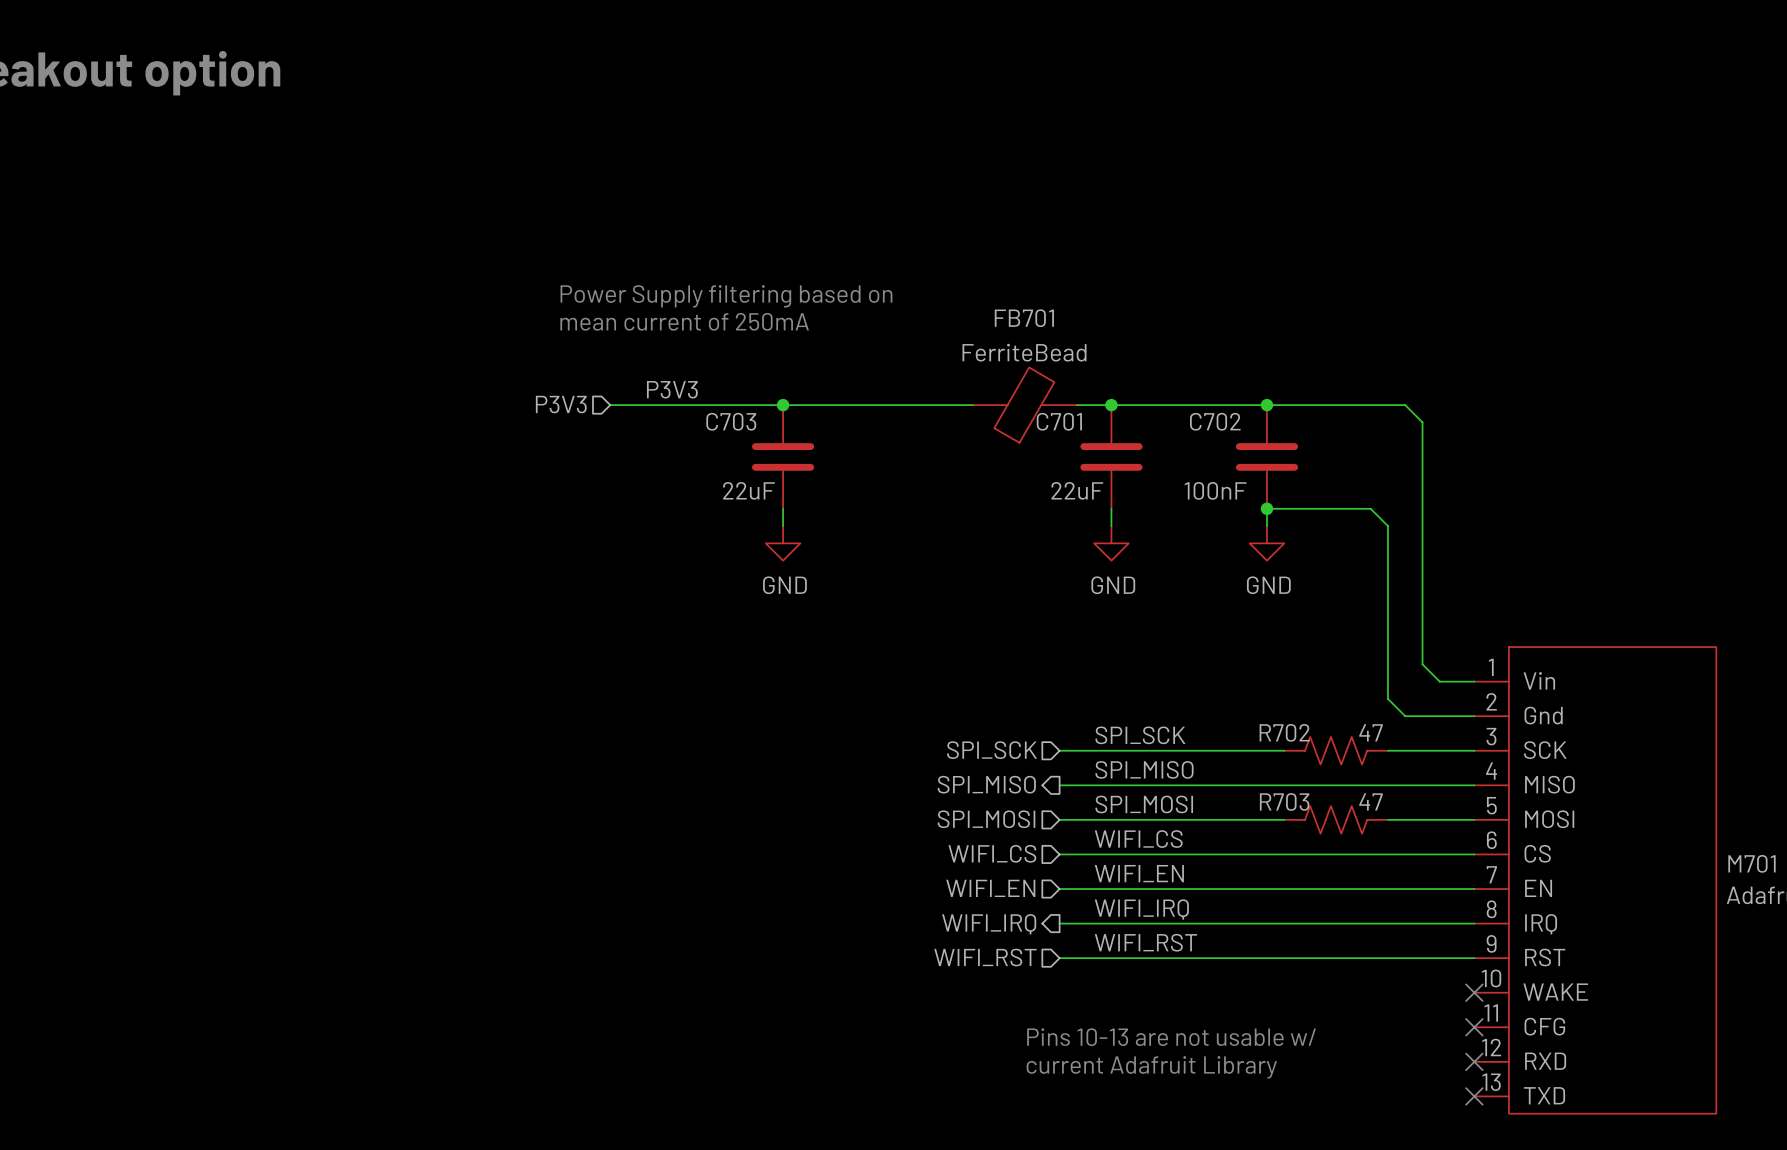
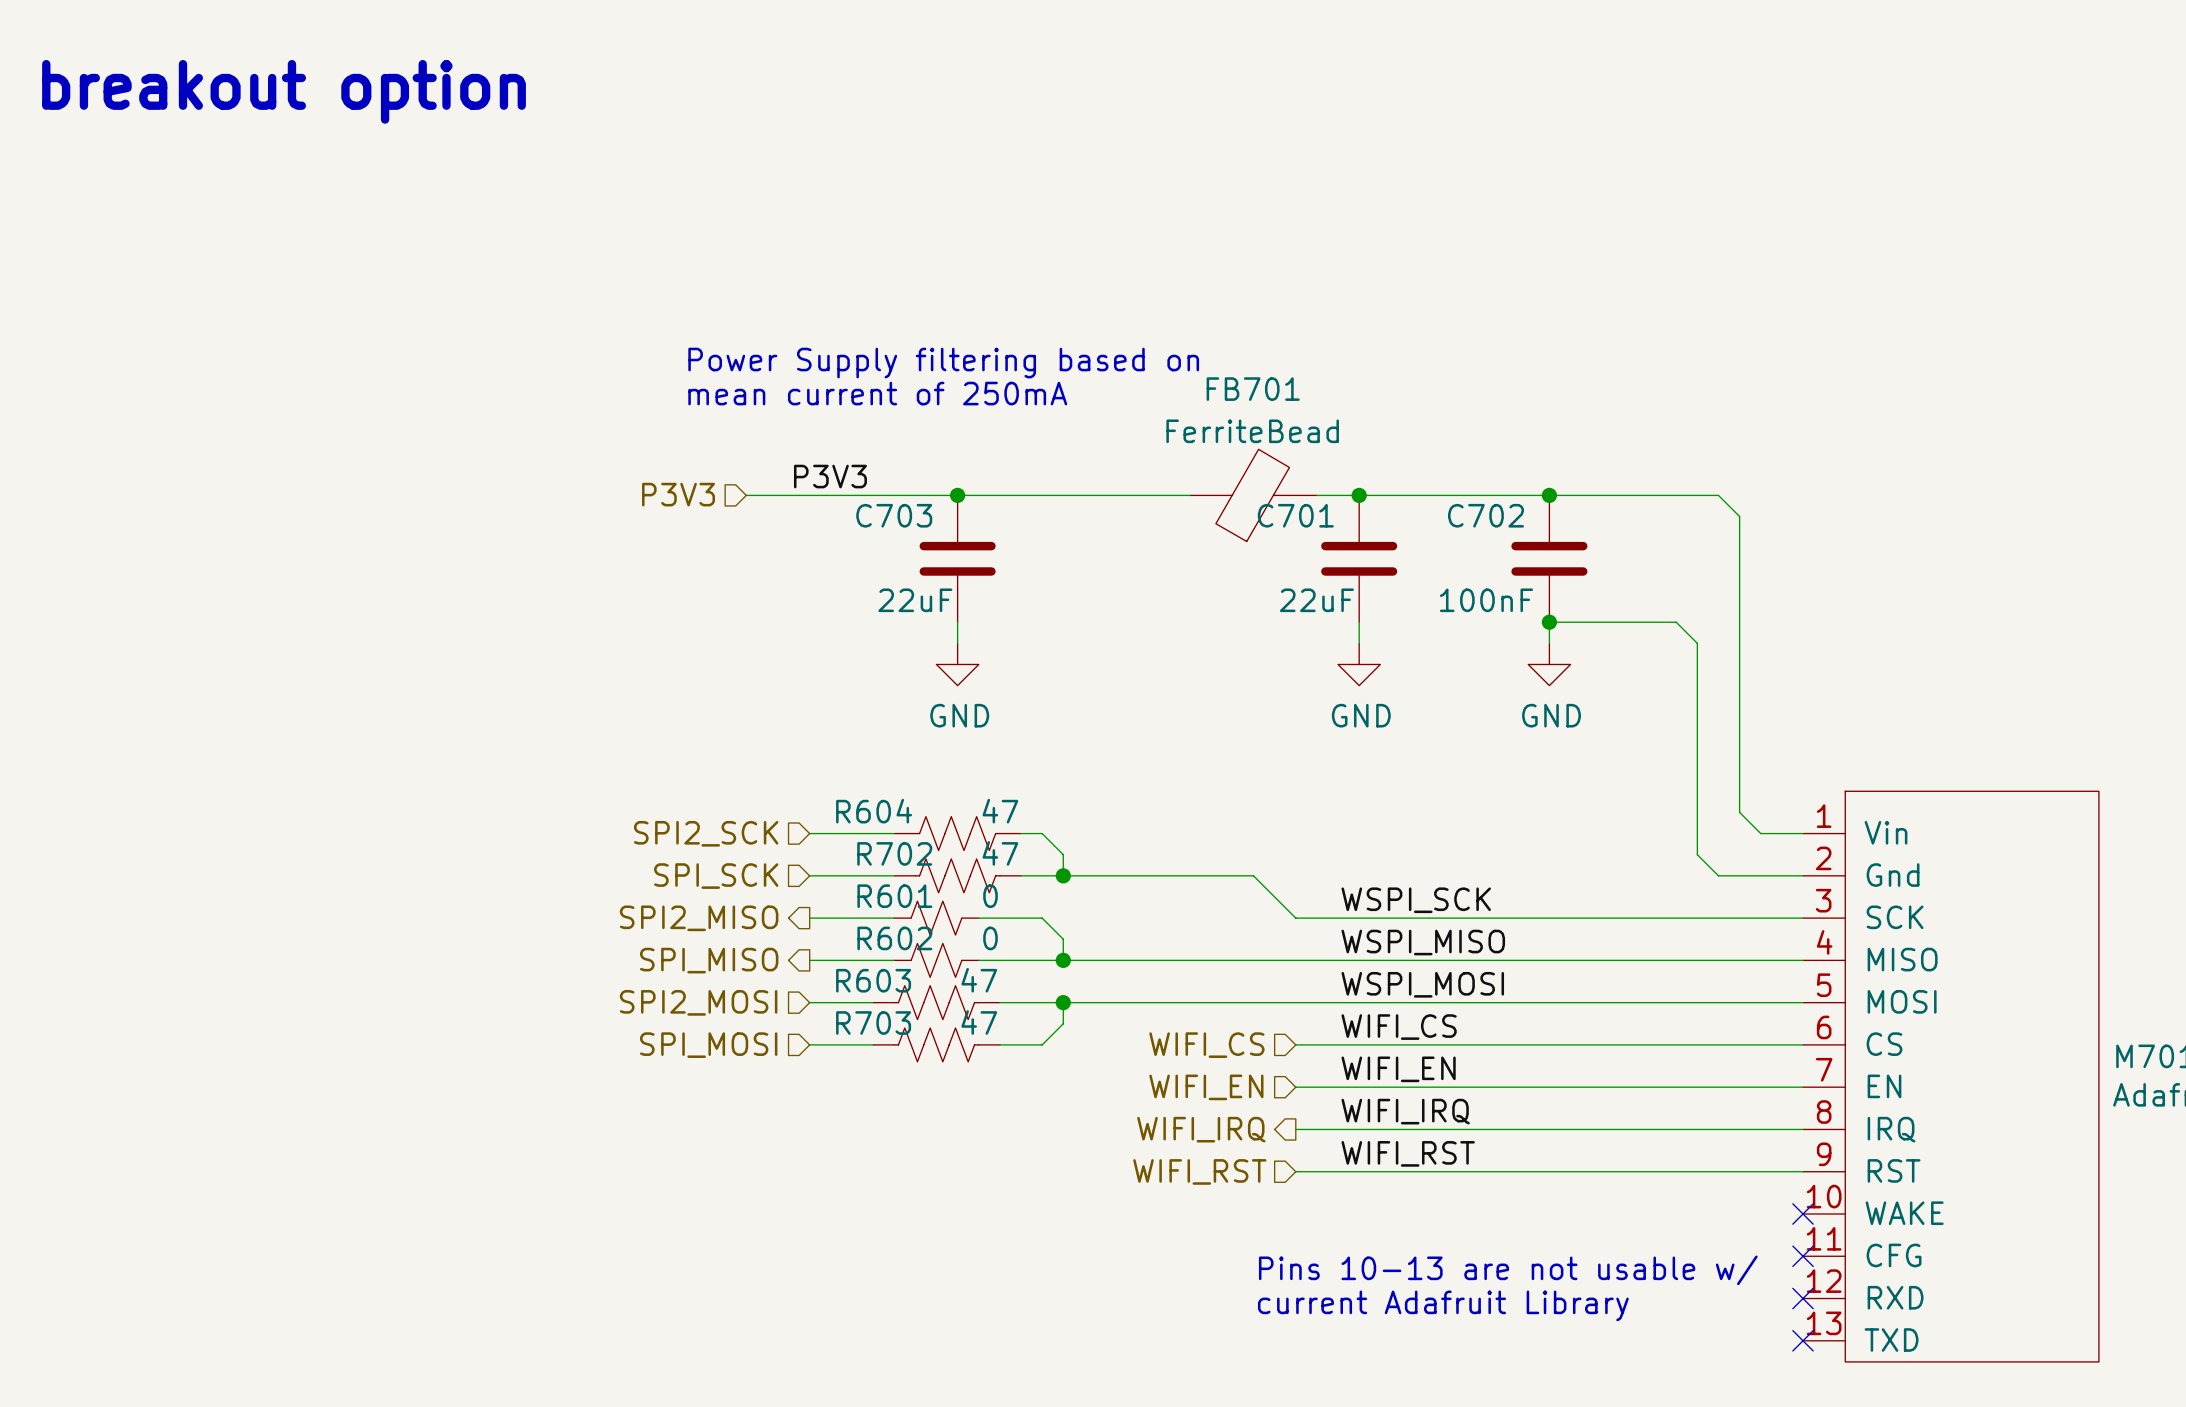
hierarchical label: none -> SPI2_SCK (706, 833)
wire: none -> (809, 833) (894, 833)
R604: none -> 47 (957, 833)
wire: none -> (1021, 833) (1042, 833) (1063, 854) (1063, 875)
hierarchical label: none -> SPI_SCK (716, 876)
wire: none -> (809, 875) (894, 875)
wire: none -> (1021, 875) (1253, 875) (1295, 918)
junction: none -> (1063, 875)
label: SPI_SCK (1140, 735) -> WSPI_SCK (1416, 900)
hierarchical label: none -> SPI2_MISO (699, 918)
wire: none -> (809, 918) (894, 918)
R601: none -> 0 (936, 918)
wire: none -> (978, 918) (1042, 918) (1063, 939) (1063, 960)
hierarchical label: SPI_SCK (992, 750) -> none
wire: none -> (1570, 918) (1697, 918)
R702 position: (1336, 750) -> (957, 875)
label: SPI_MISO (1144, 769) -> WSPI_MISO (1423, 942)
hierarchical label: none -> SPI_MISO (709, 960)
hierarchical label: SPI_MISO (986, 784) -> none
wire: none -> (809, 960) (894, 960)
R602: none -> 0 (936, 960)
wire: none -> (978, 960) (1295, 960)
junction: none -> (1063, 960)
label: SPI_MOSI (1144, 804) -> WSPI_MOSI (1422, 984)
hierarchical label: none -> SPI2_MOSI (698, 1002)
wire: none -> (809, 1002) (873, 1002)
R603: none -> 47 (936, 1002)
wire: none -> (999, 1002) (1295, 1002)
wire: none -> (1063, 1002) (1063, 1023) (1042, 1044) (999, 1044)
junction: none -> (1063, 1002)
hierarchical label: SPI_MOSI (986, 819) -> none
wire: none -> (1570, 1002) (1697, 1002)
R703 position: (1336, 819) -> (936, 1044)
hierarchical label: none -> SPI_MOSI (708, 1045)
wire: none -> (809, 1044) (873, 1044)

